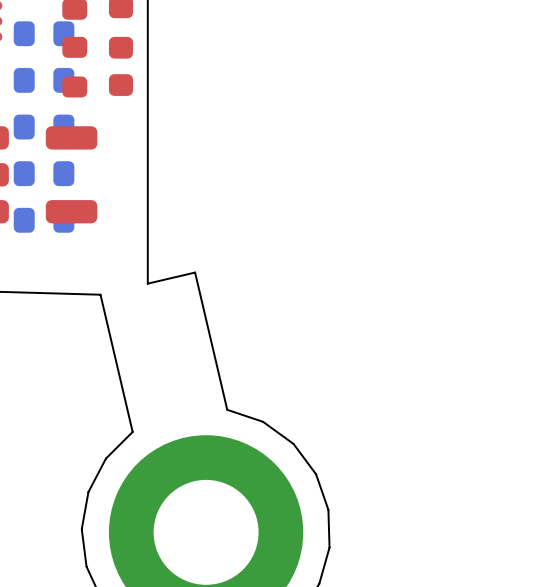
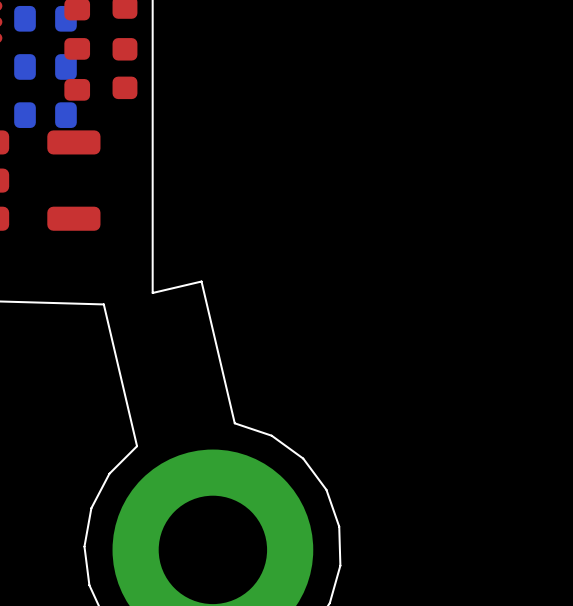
part: none -> (45, 18)
part: (44, 33) -> none
part: none -> (45, 66)
part: (44, 80) -> none
part: none -> (45, 115)
part: (44, 127) -> none
part: (44, 173) -> none
part: (44, 220) -> none

